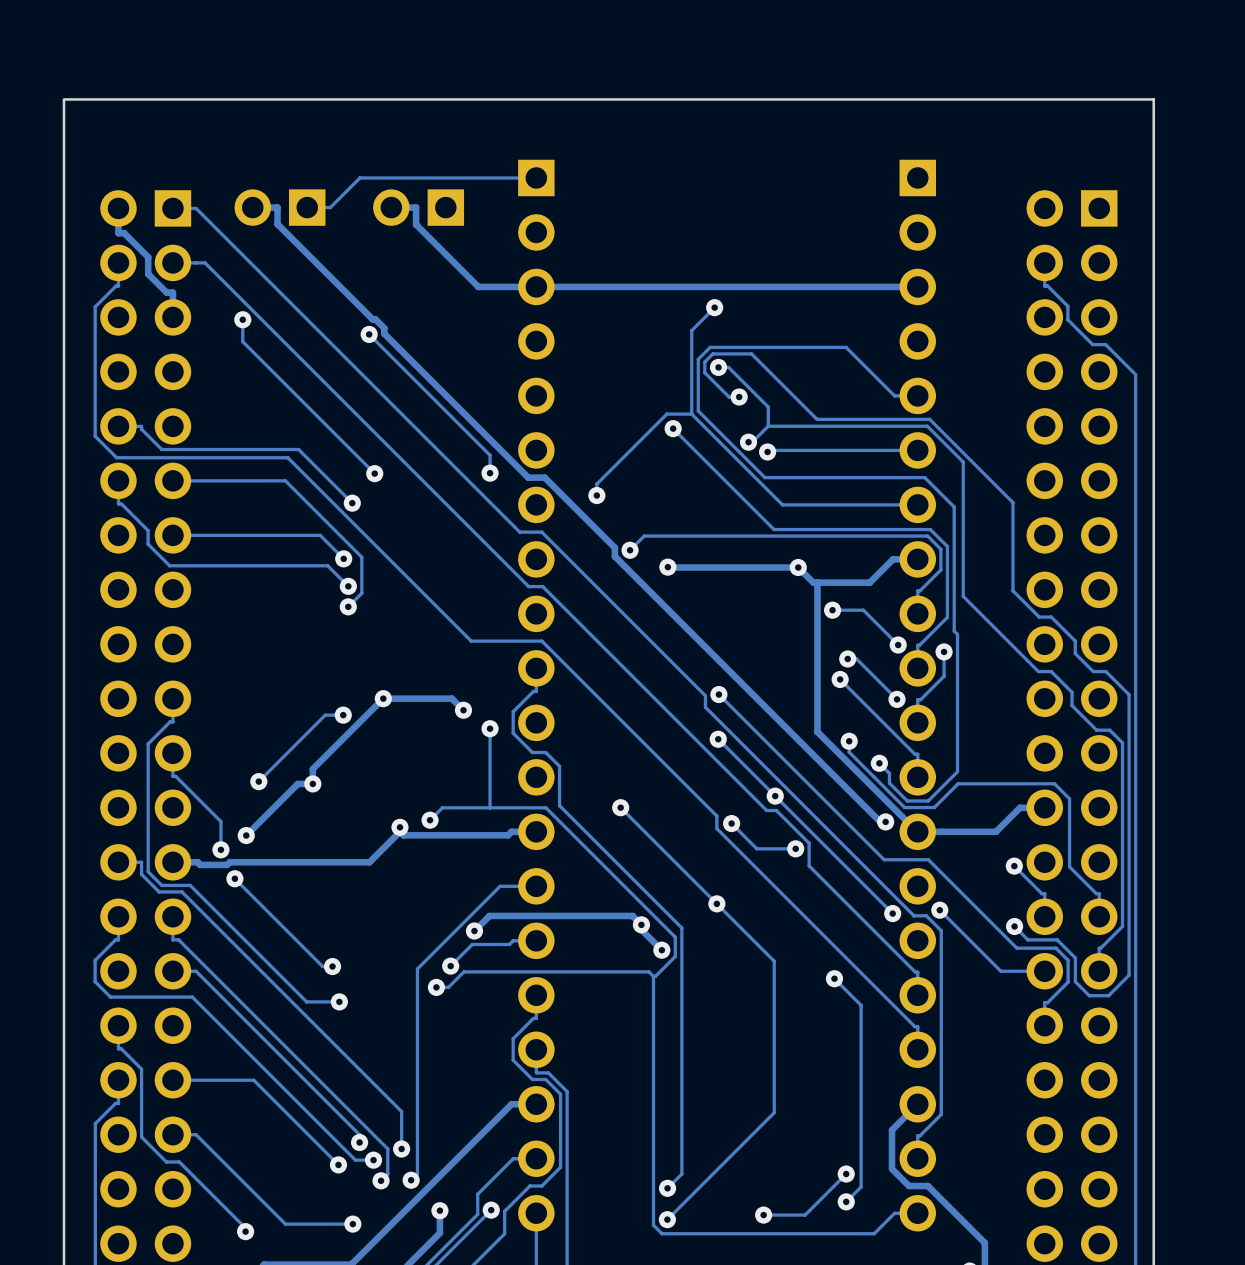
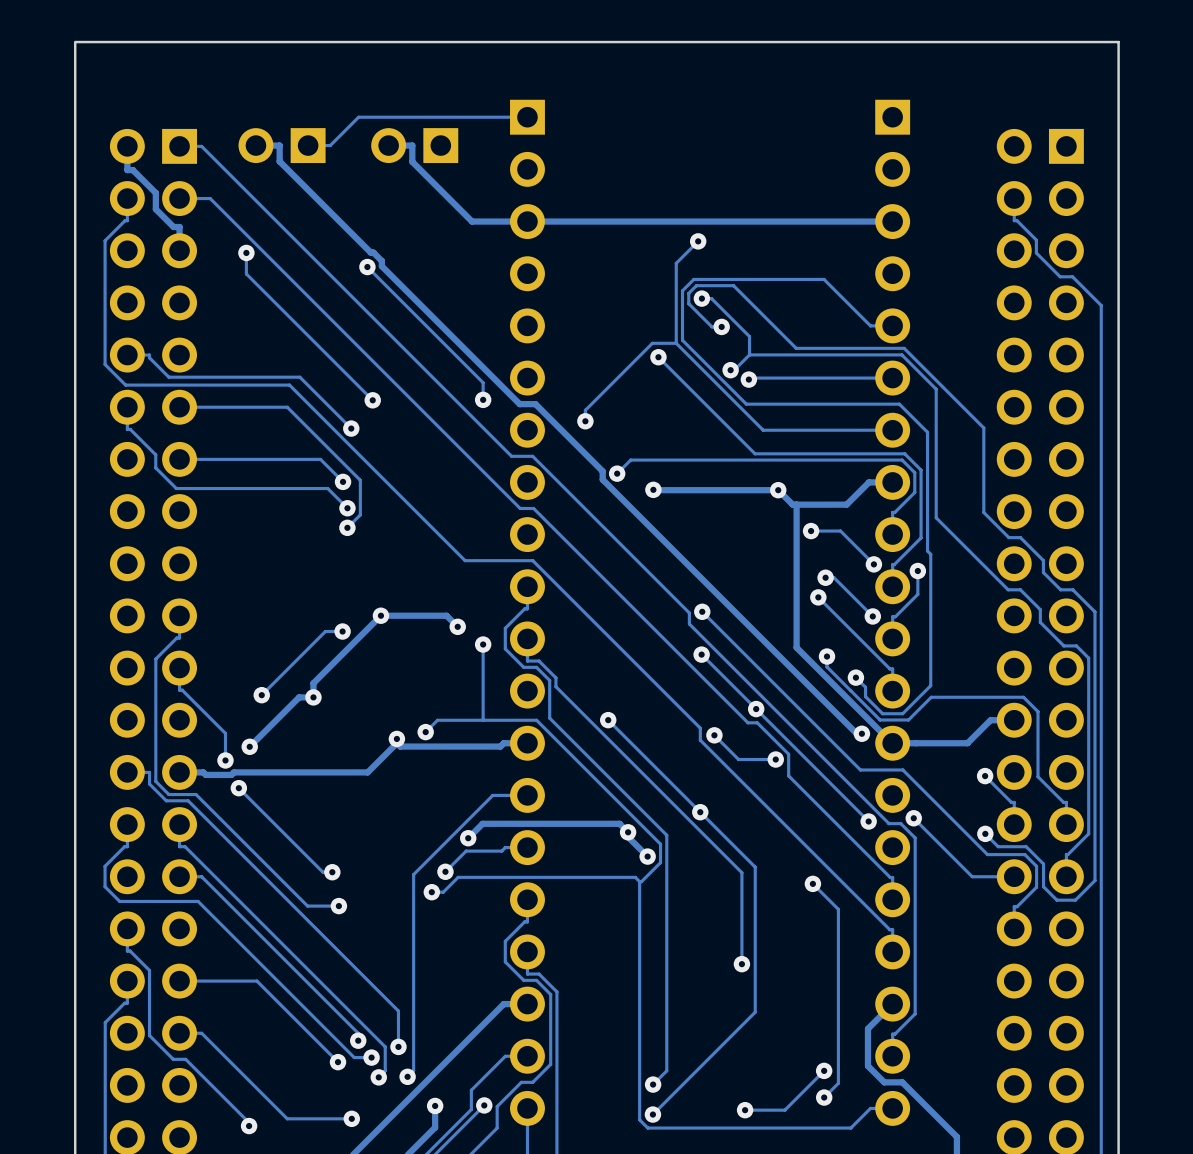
track: none -> (527, 638) (527, 661) (539, 661) (555, 677) (555, 686) (741, 872) (741, 964)
via: none -> (741, 964)

